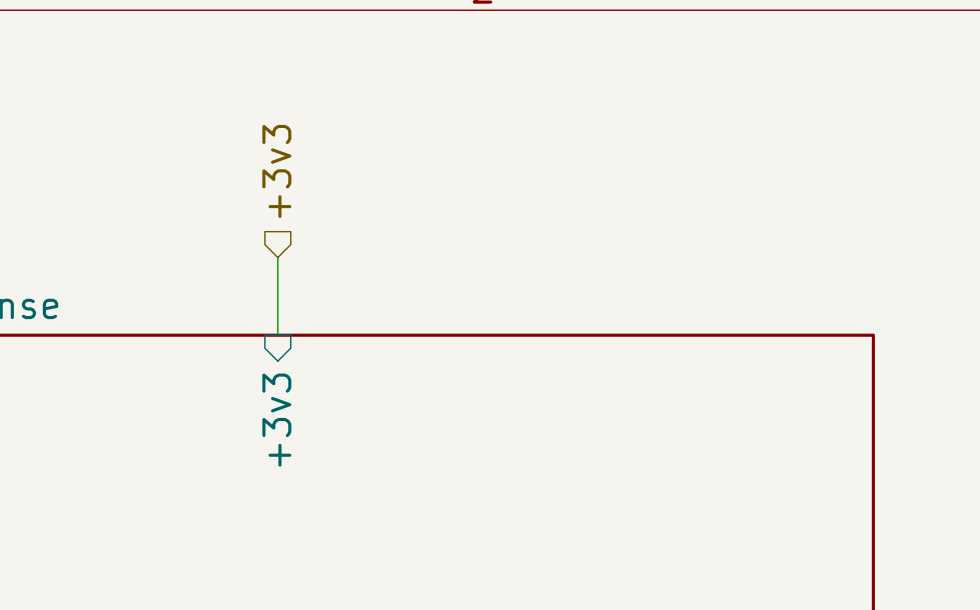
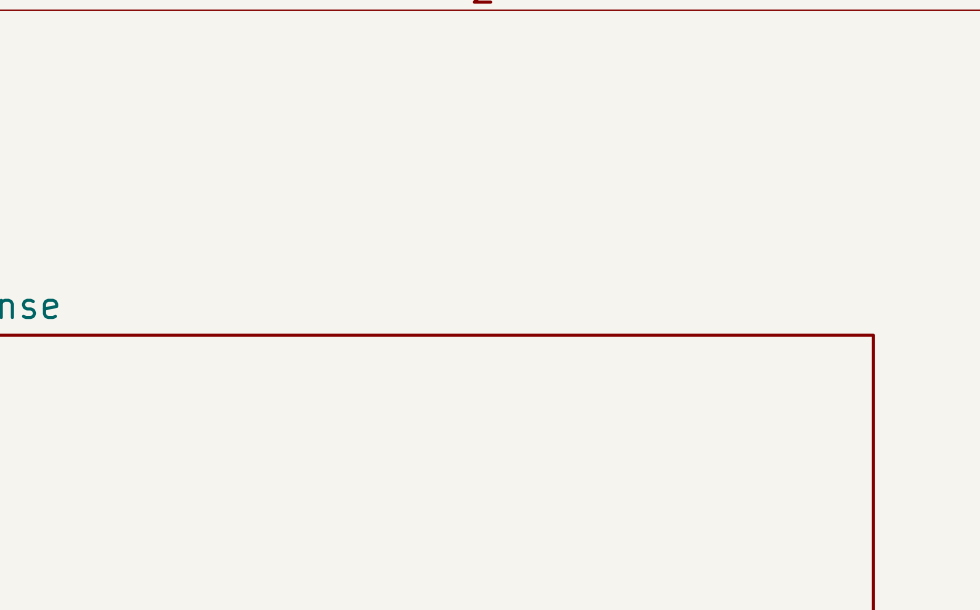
hierarchical label: +3v3 (276, 171) -> none
wire: (277, 257) (277, 335) -> none
sheet pin: +3v3 (276, 420) -> none

